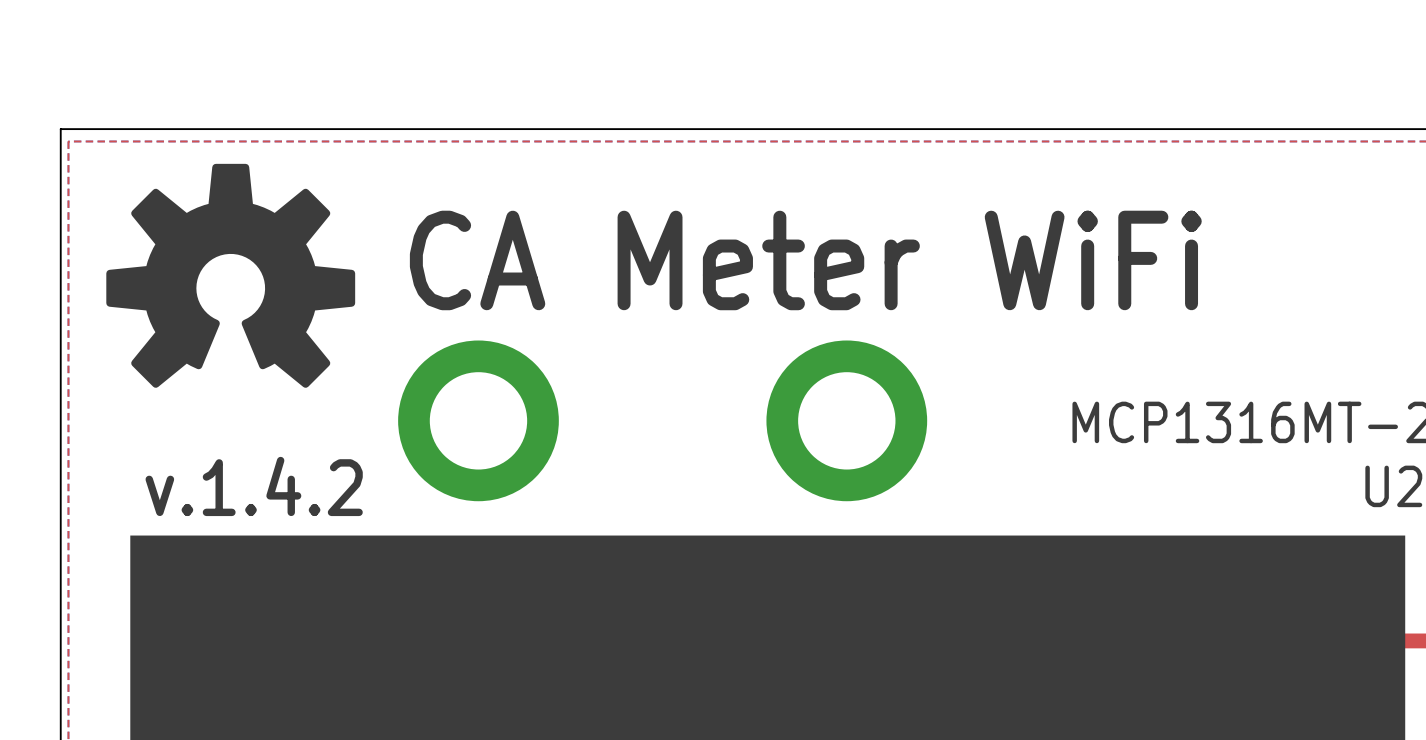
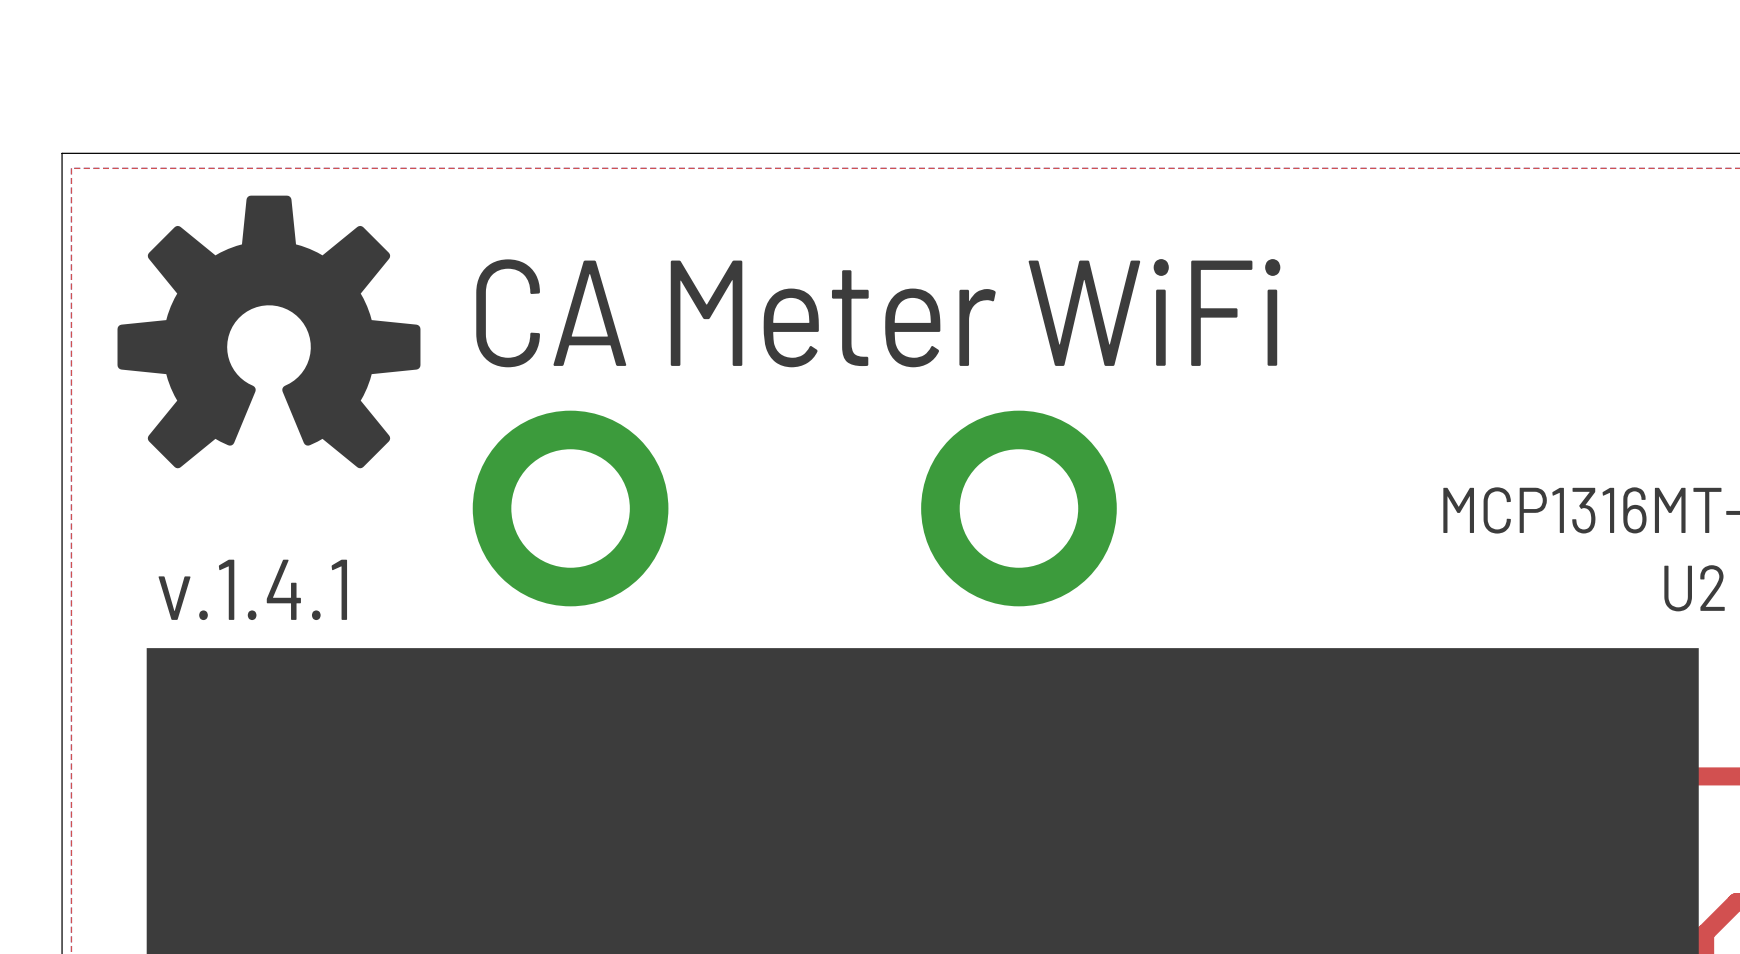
text: v.1.4.2 (254, 486) -> v.1.4.1 (252, 589)

